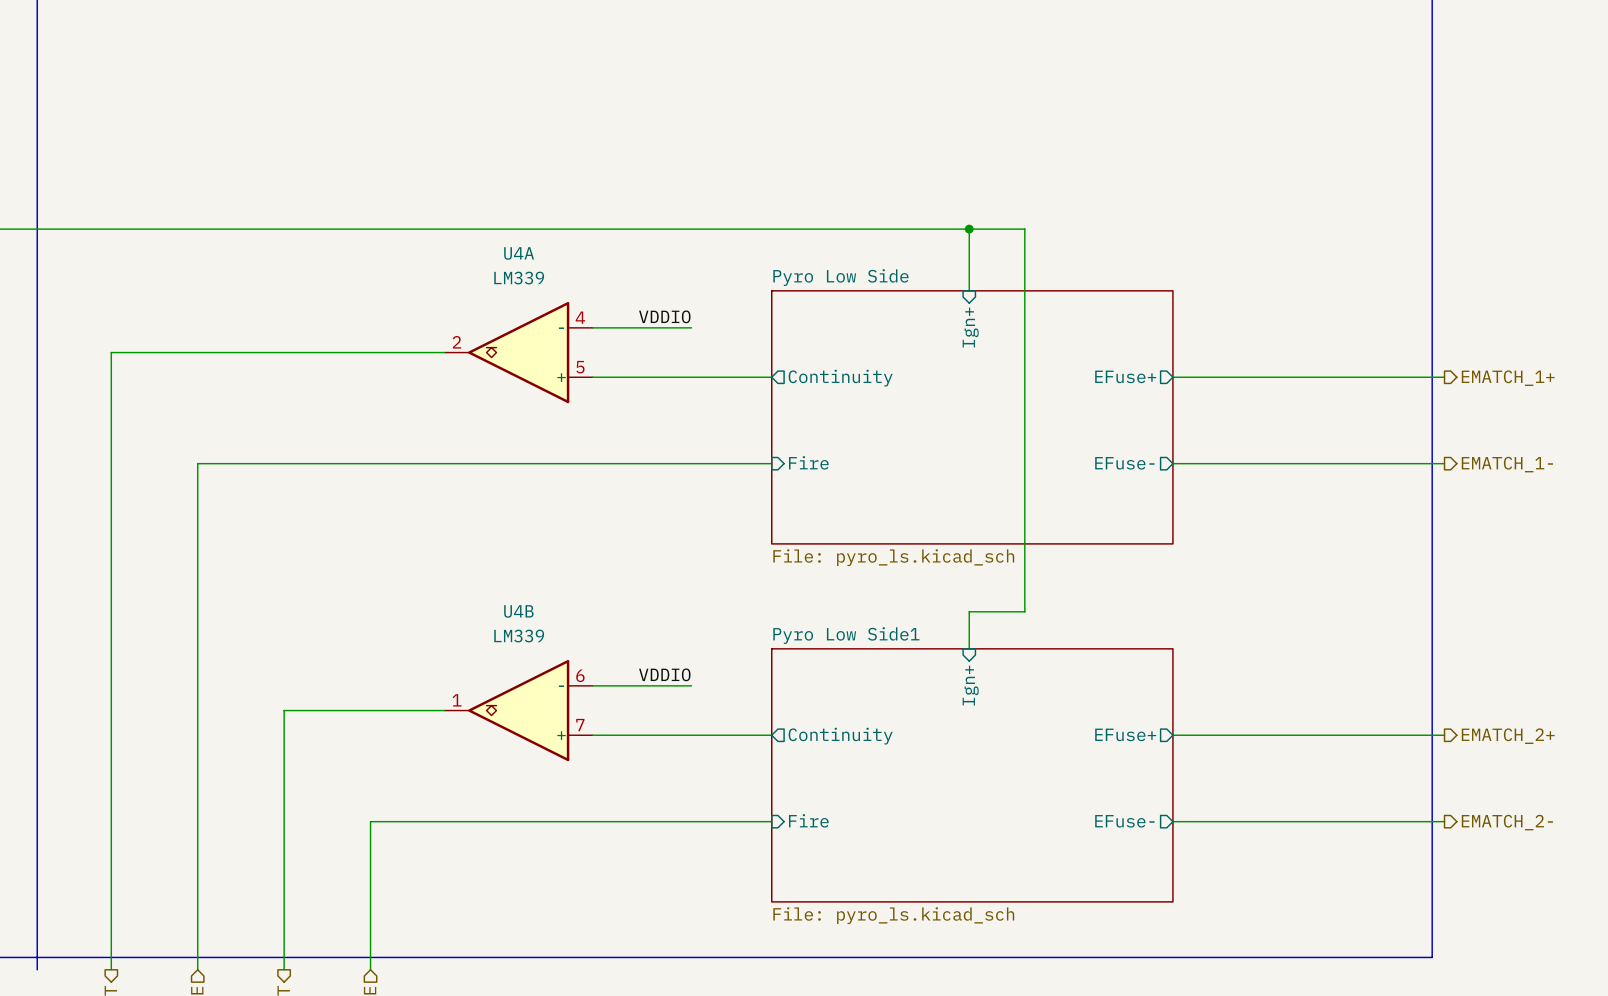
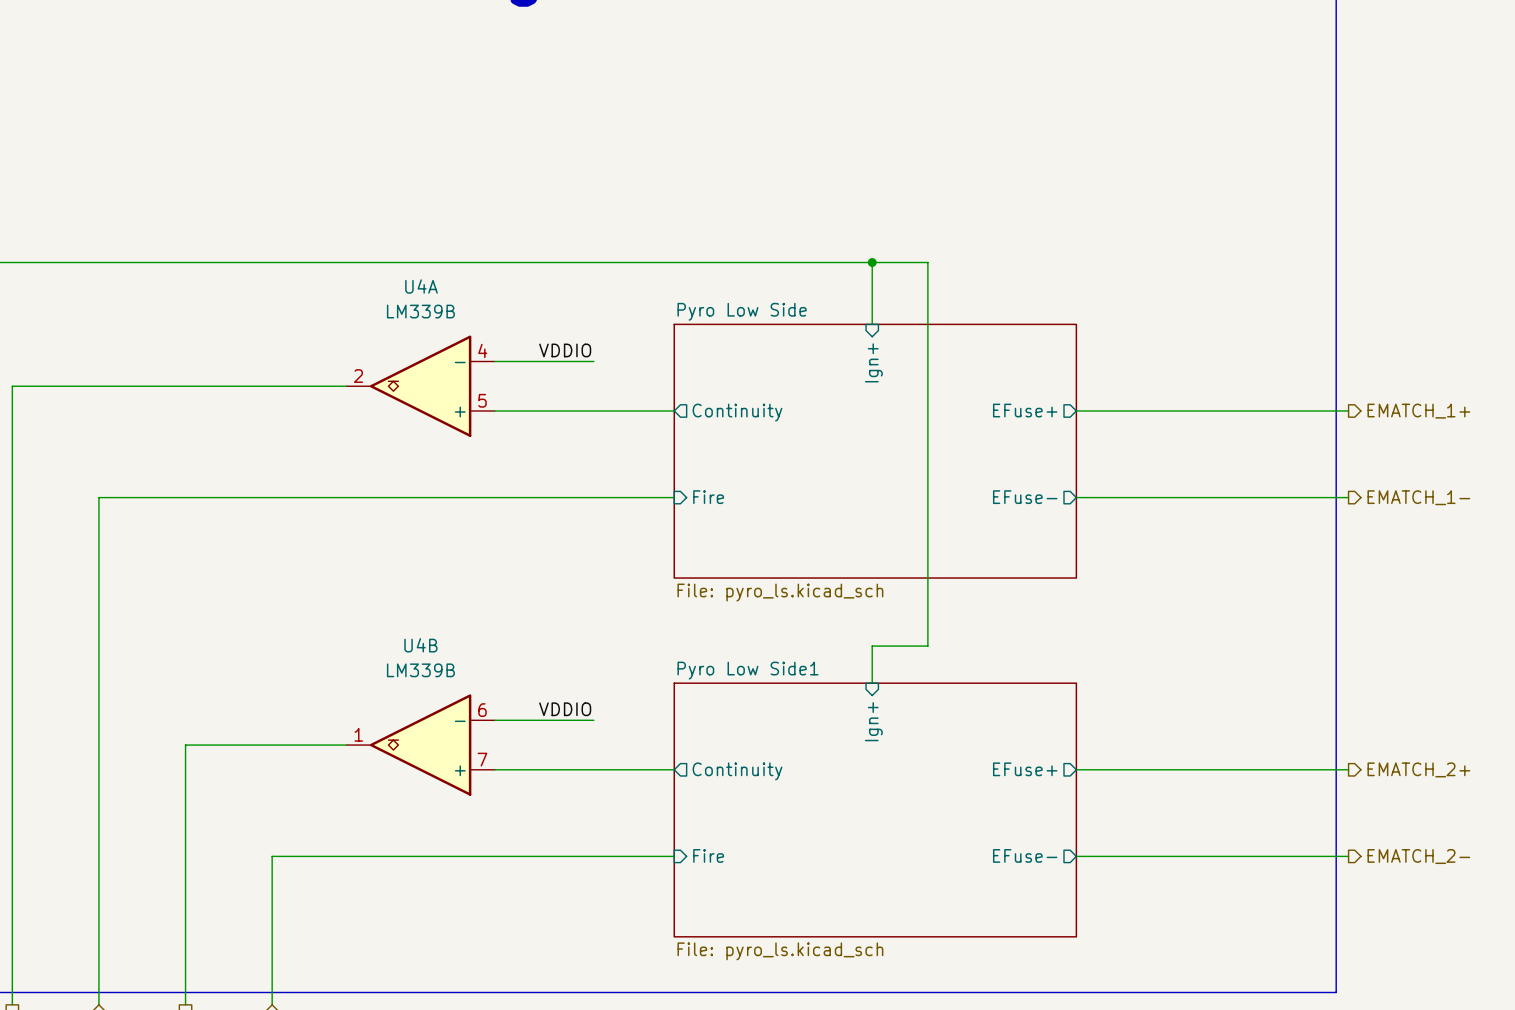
U4A value: LM339 (519, 278) -> LM339B (420, 311)
U4B value: LM339 (519, 636) -> LM339B (420, 670)

